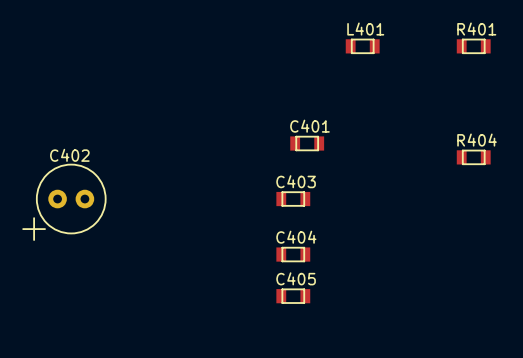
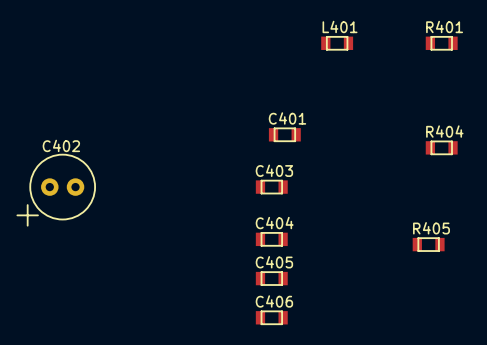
R405: none -> (428, 244)
C406: none -> (271, 317)

